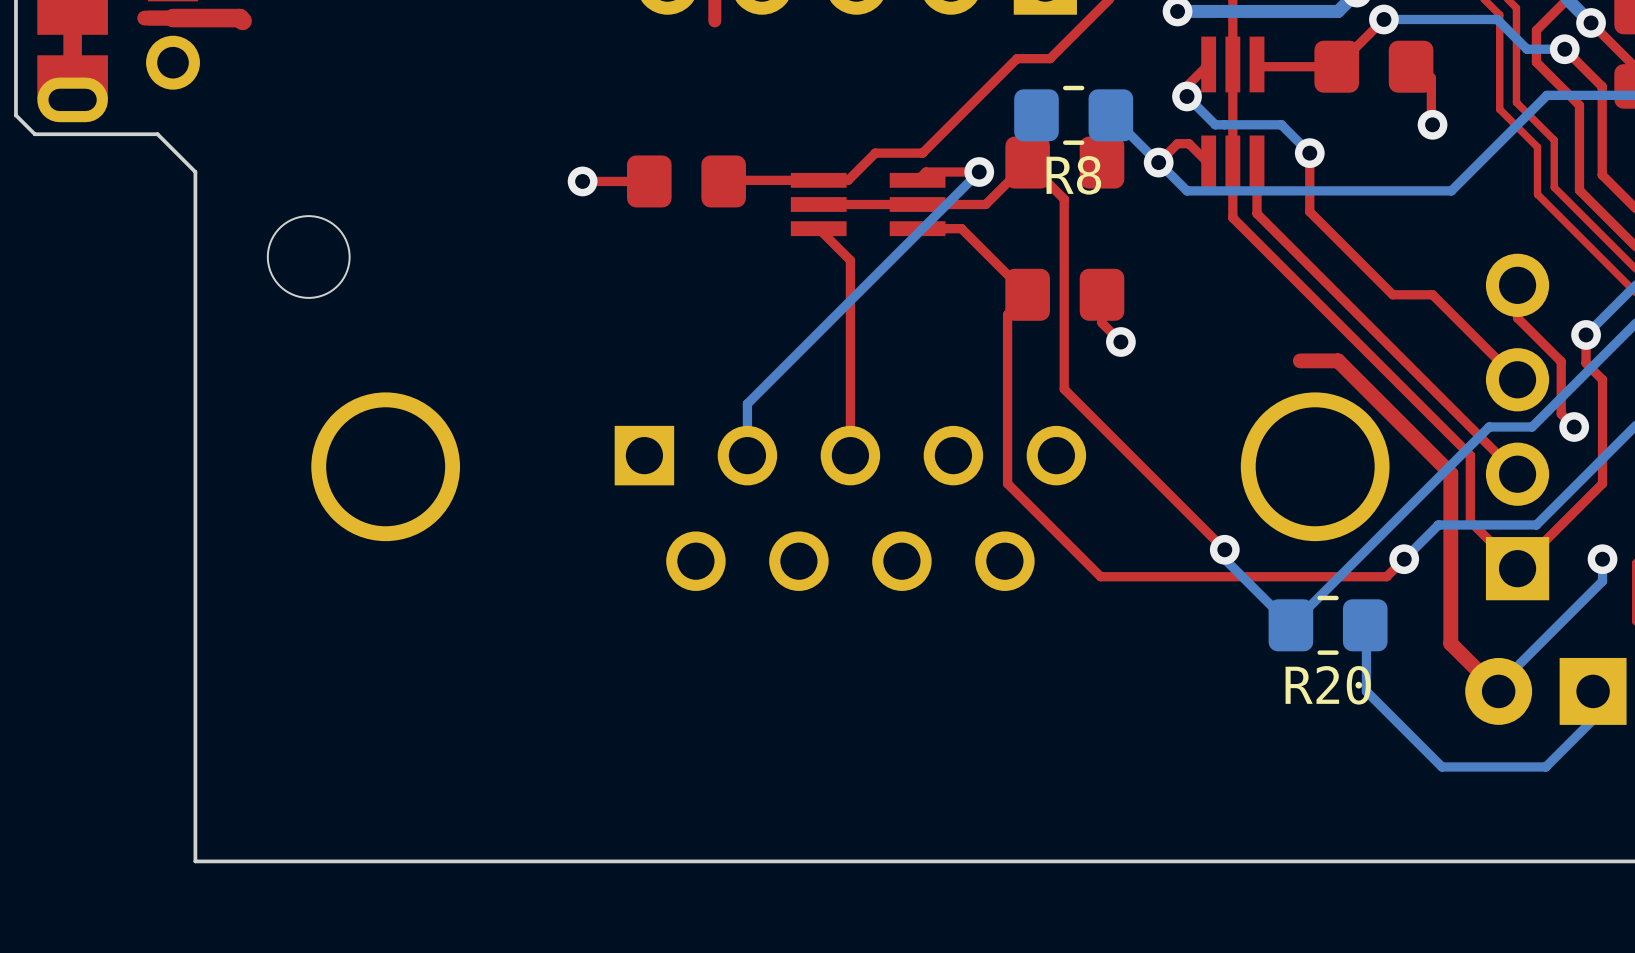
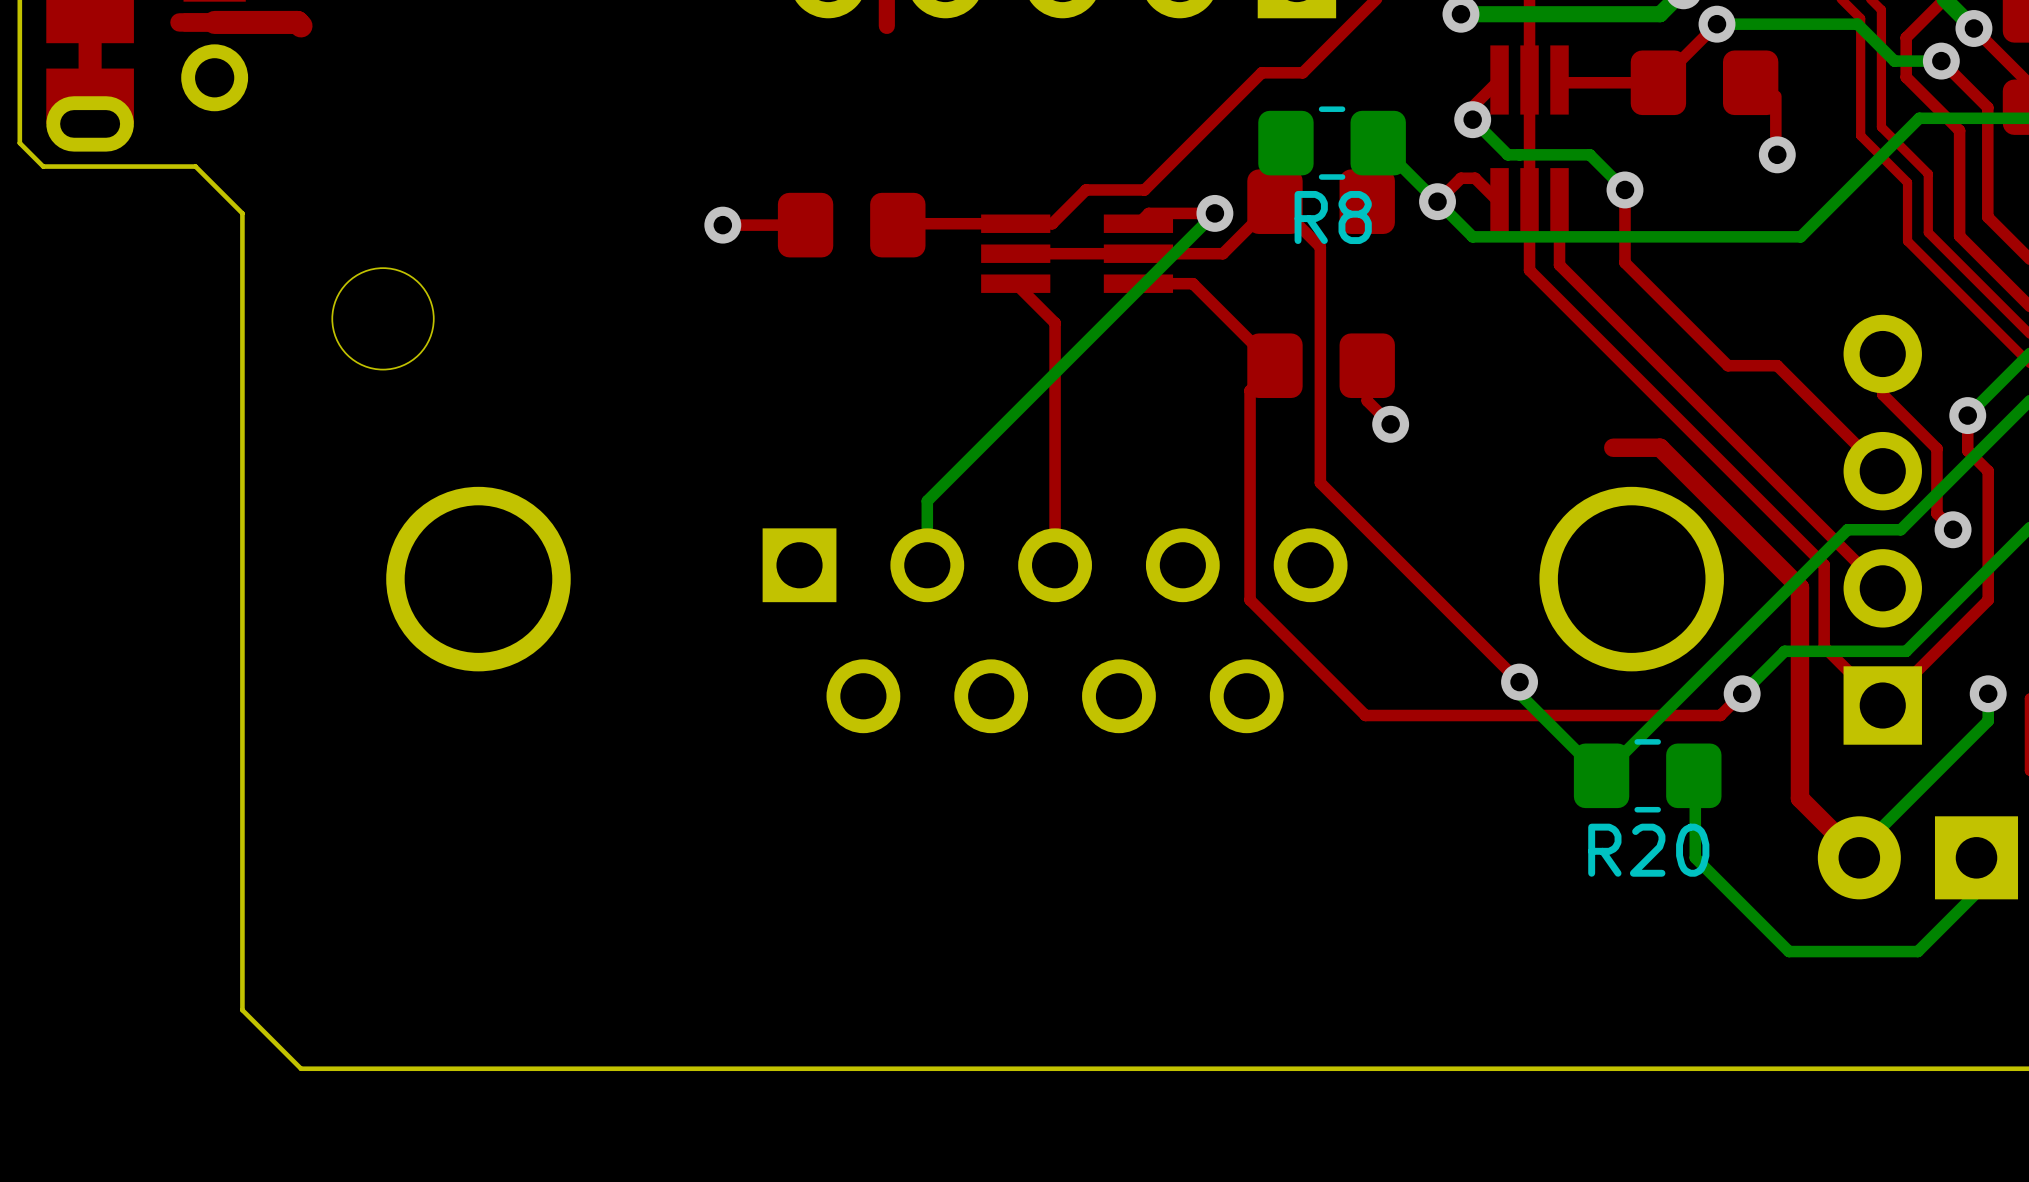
board edge: (195, 814) (195, 861) (242, 861) -> (242, 1010) (301, 1068)

